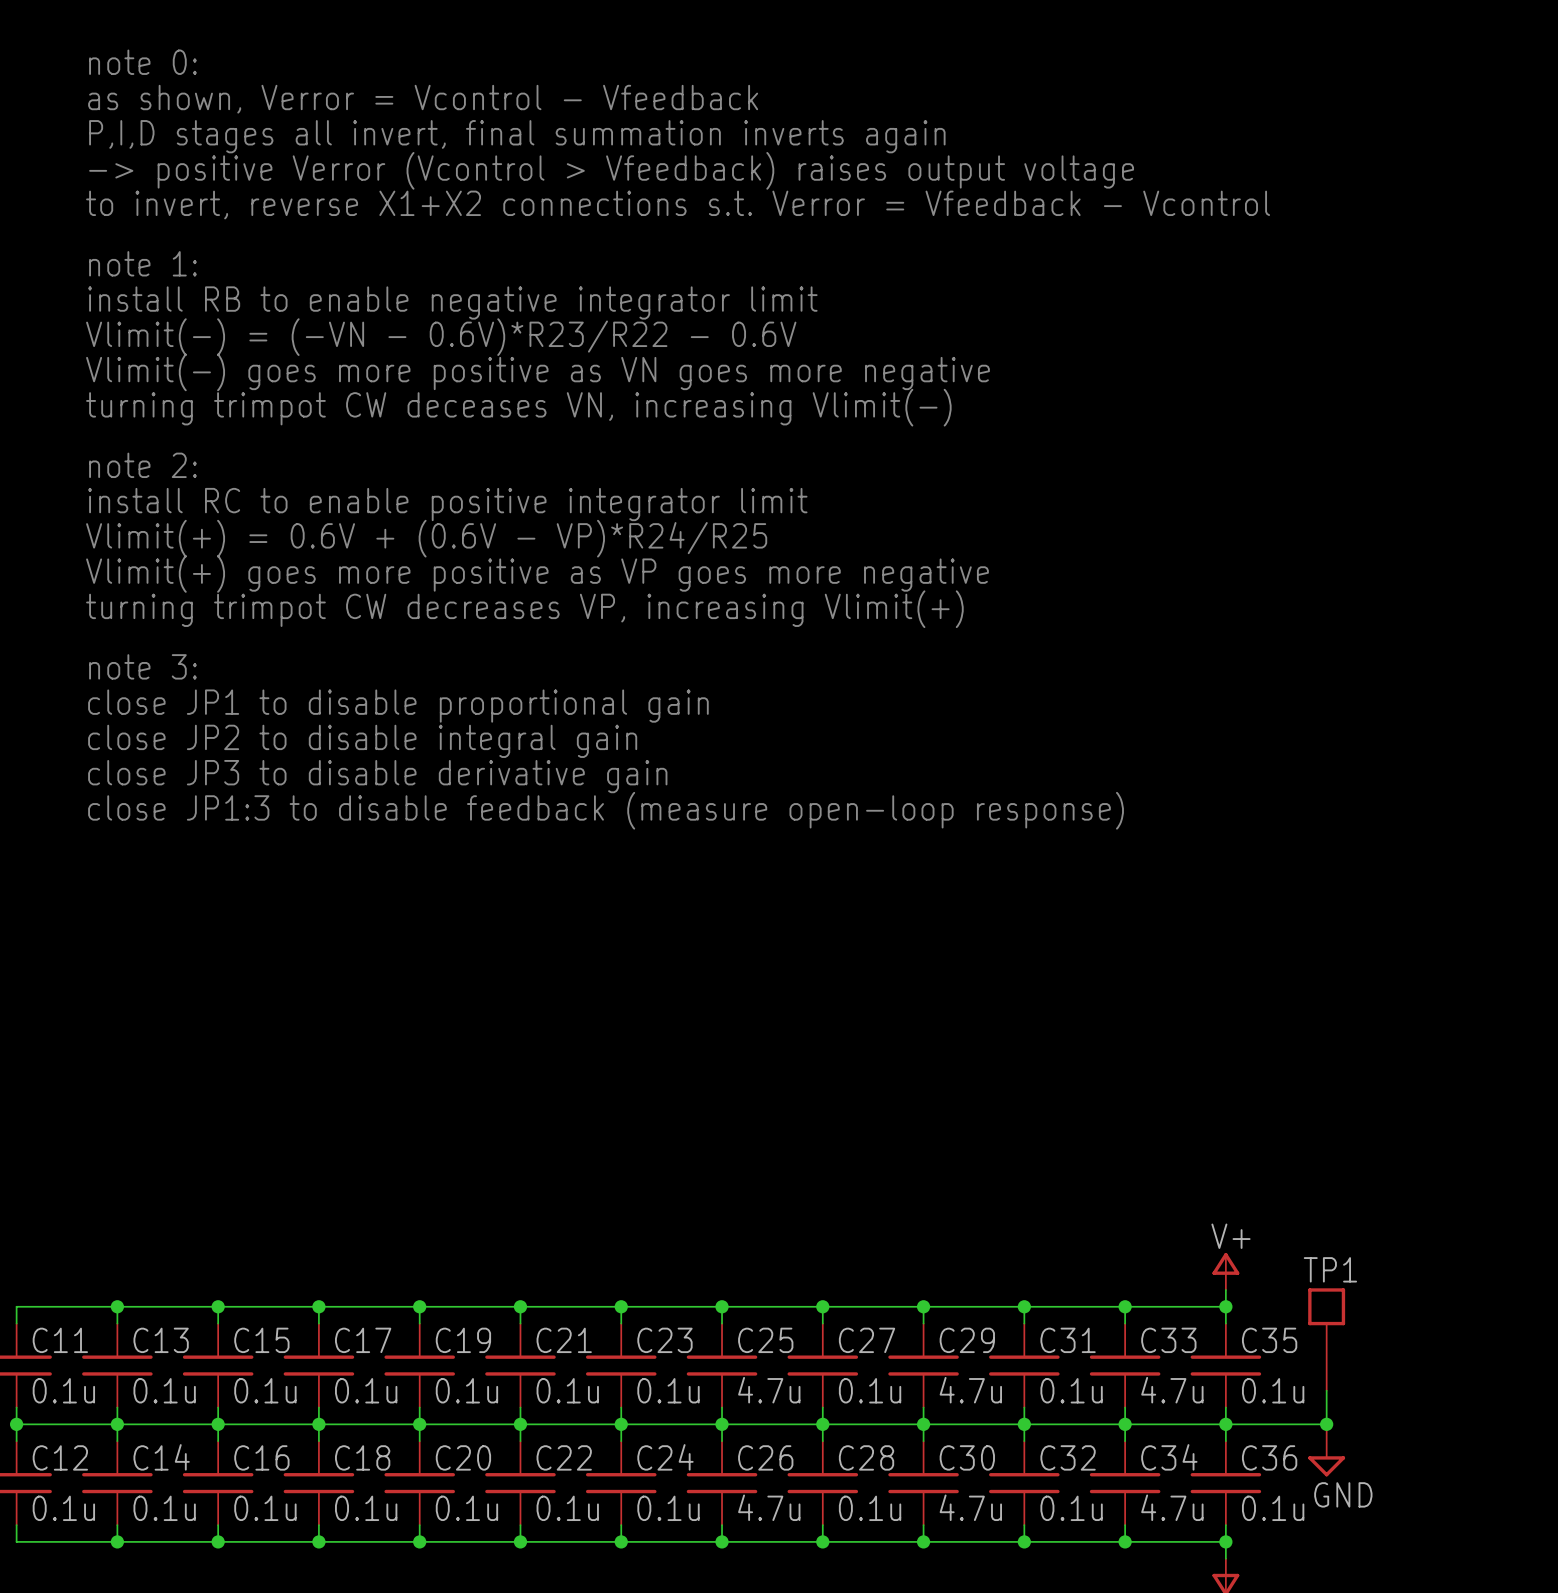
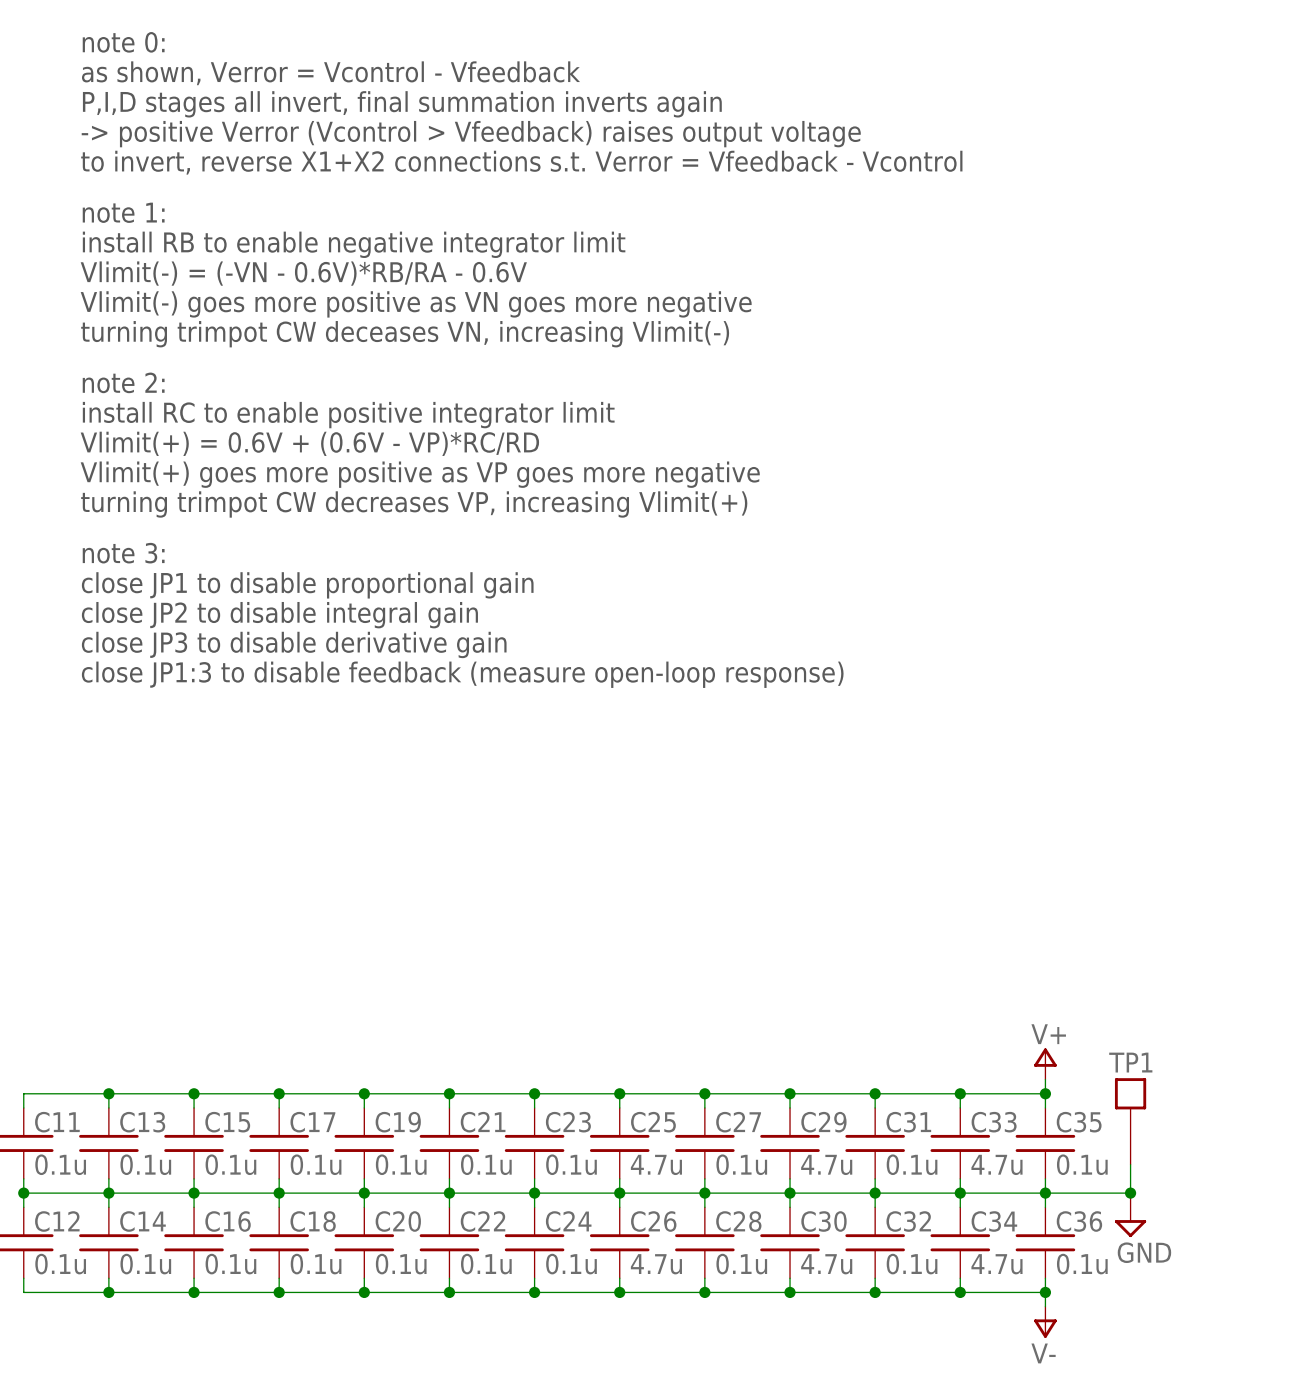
text: Vlimit(-) = (-VN - 0.6V)*R23/R22 - 0.6V (441, 337) -> Vlimit(-) = (-VN - 0.6V)*RB/RA - 0.6V (303, 273)
text: Vlimit(+) = 0.6V + (0.6V - VP)*R24/R25 (426, 538) -> Vlimit(+) = 0.6V + (0.6V - VP)*RC/RD (309, 443)

